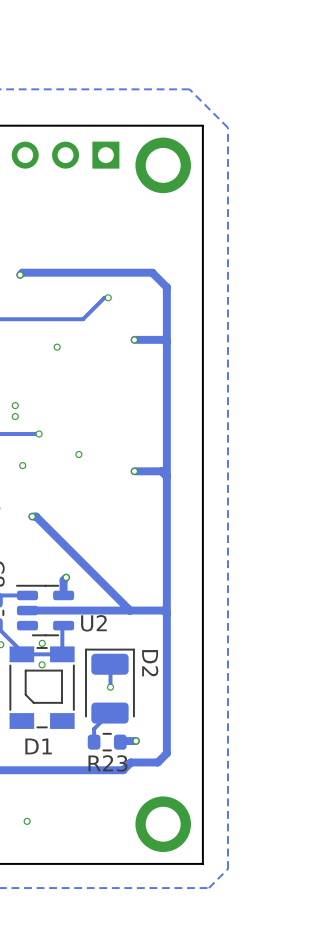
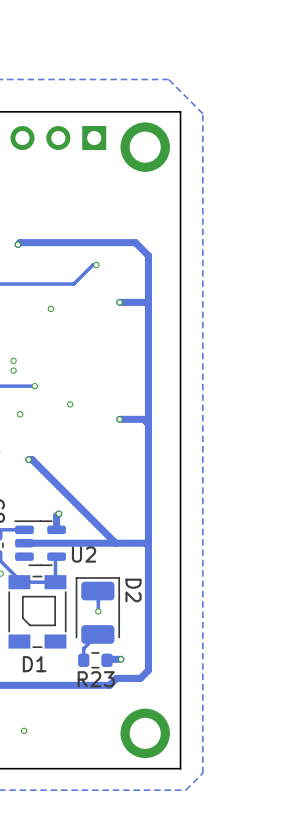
via: (42, 643) -> none
via: (42, 664) -> none

